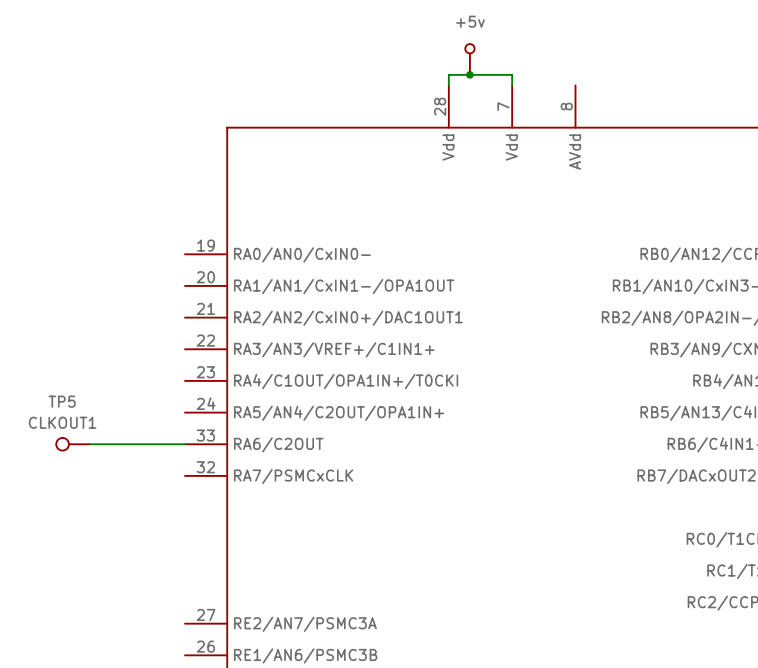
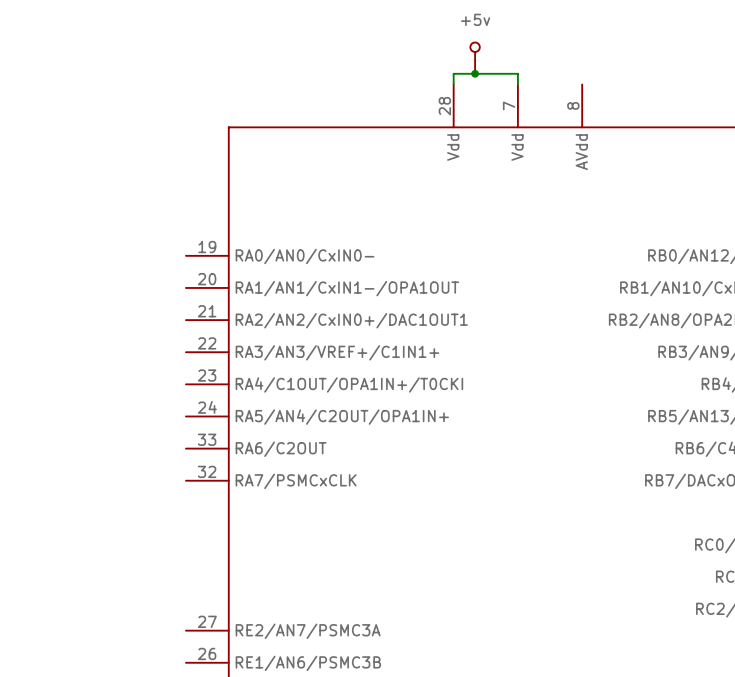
TP5: CLKOUT1 (73, 444) -> none
wire: (90, 444) (185, 444) -> none

